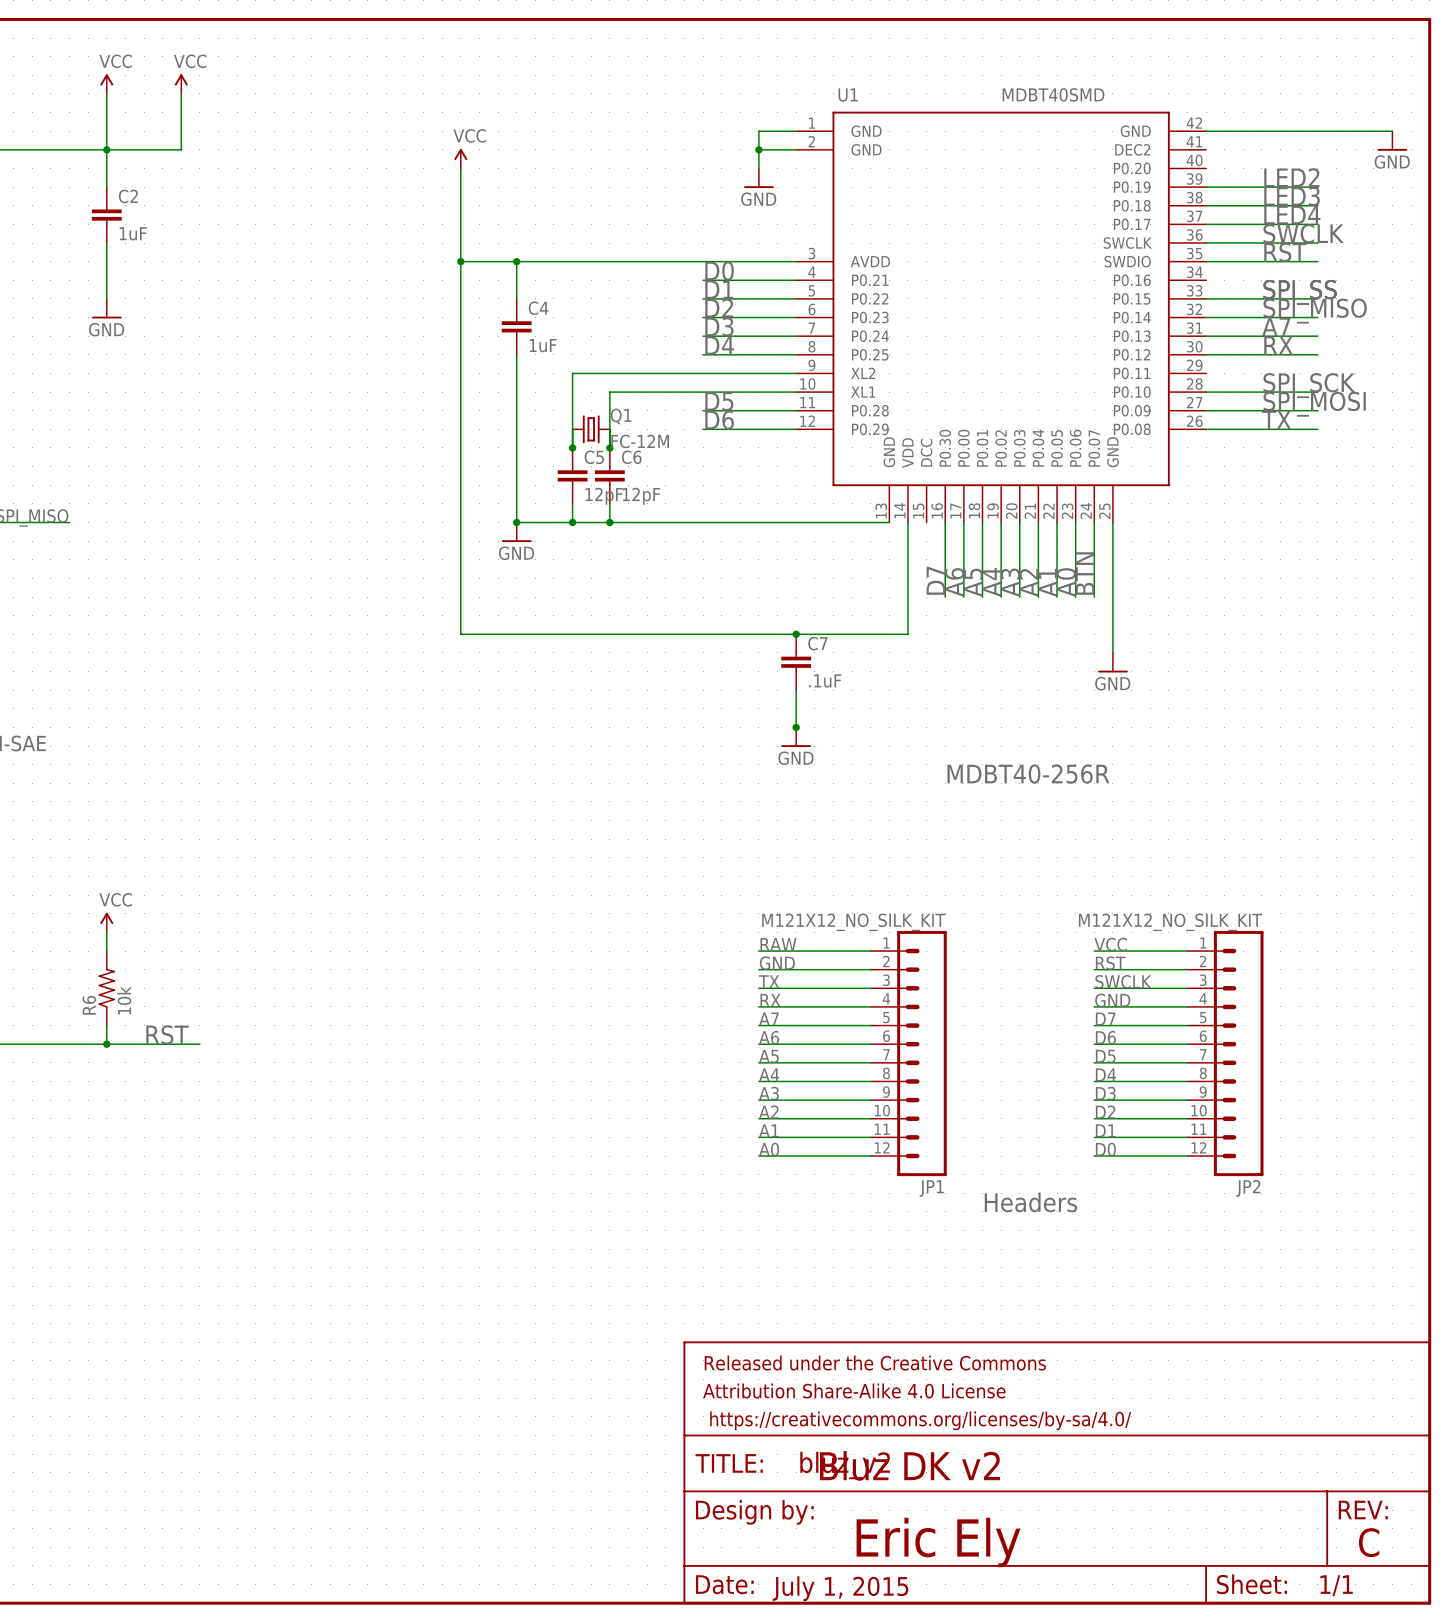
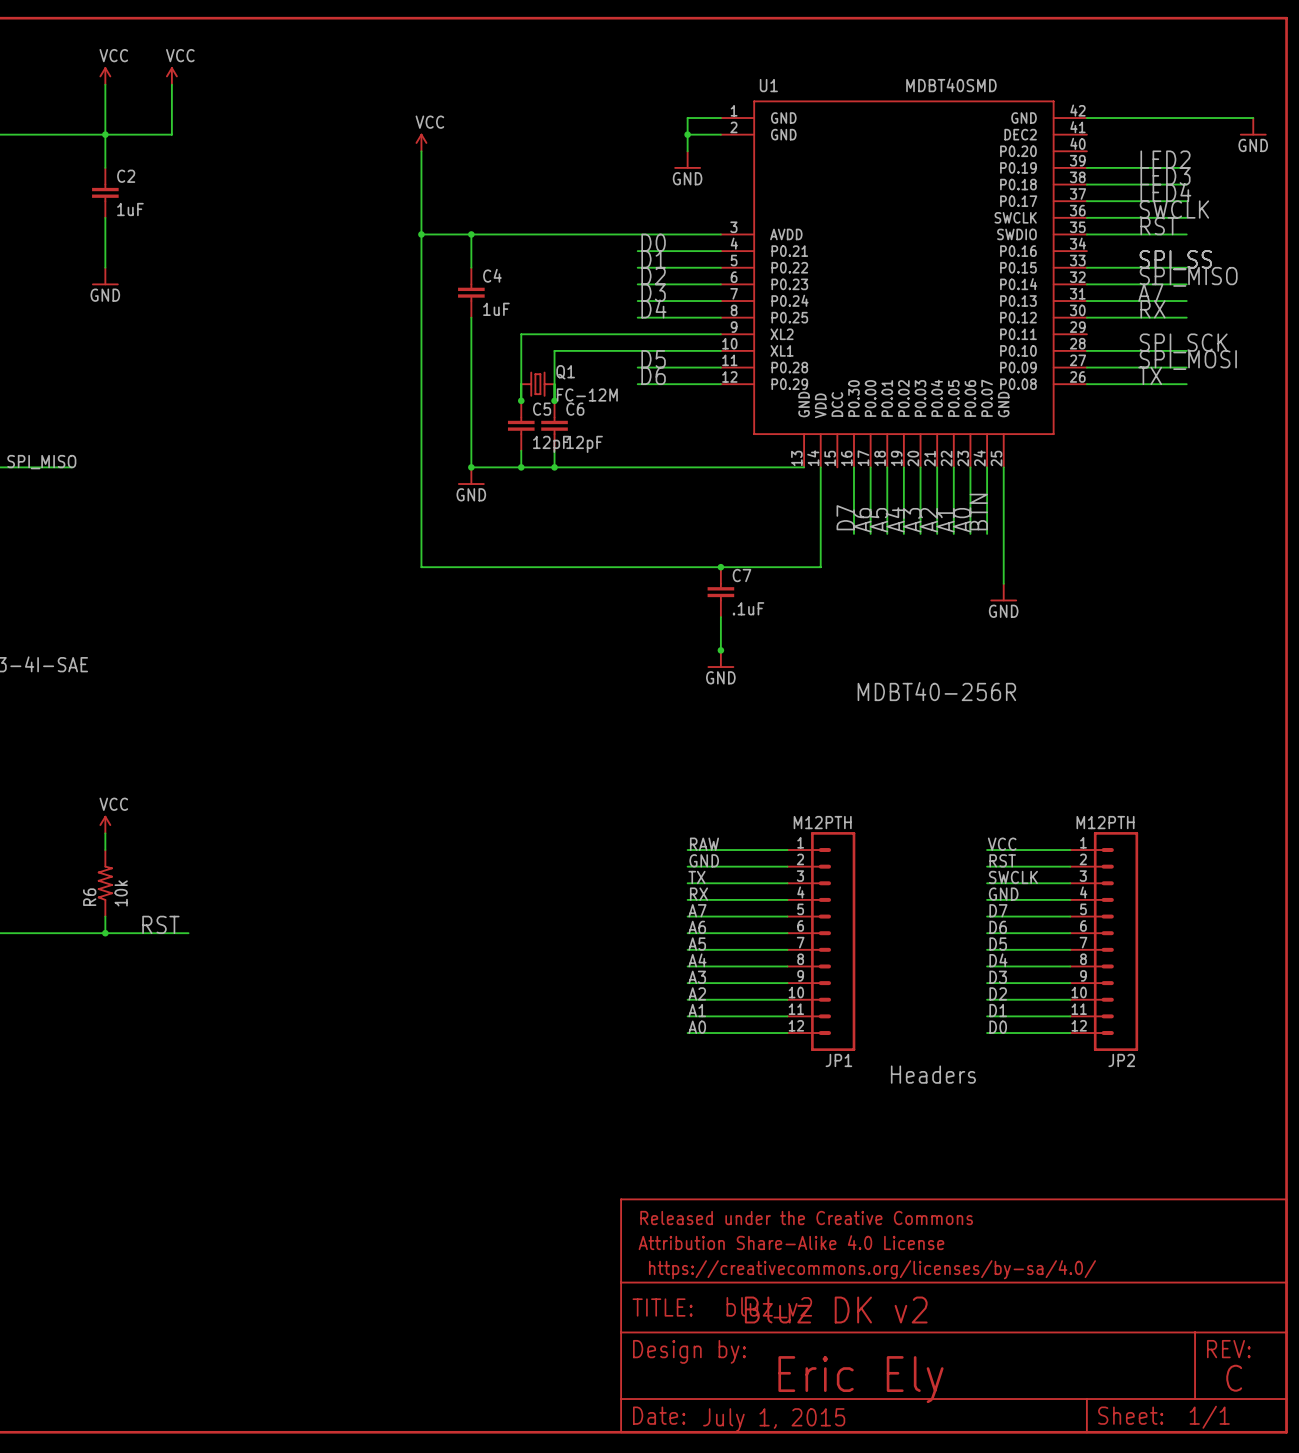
JP1 value: M121X12_NO_SILK_KIT (853, 922) -> M12PTH (822, 822)
JP2 value: M121X12_NO_SILK_KIT (1170, 922) -> M12PTH (1105, 822)

